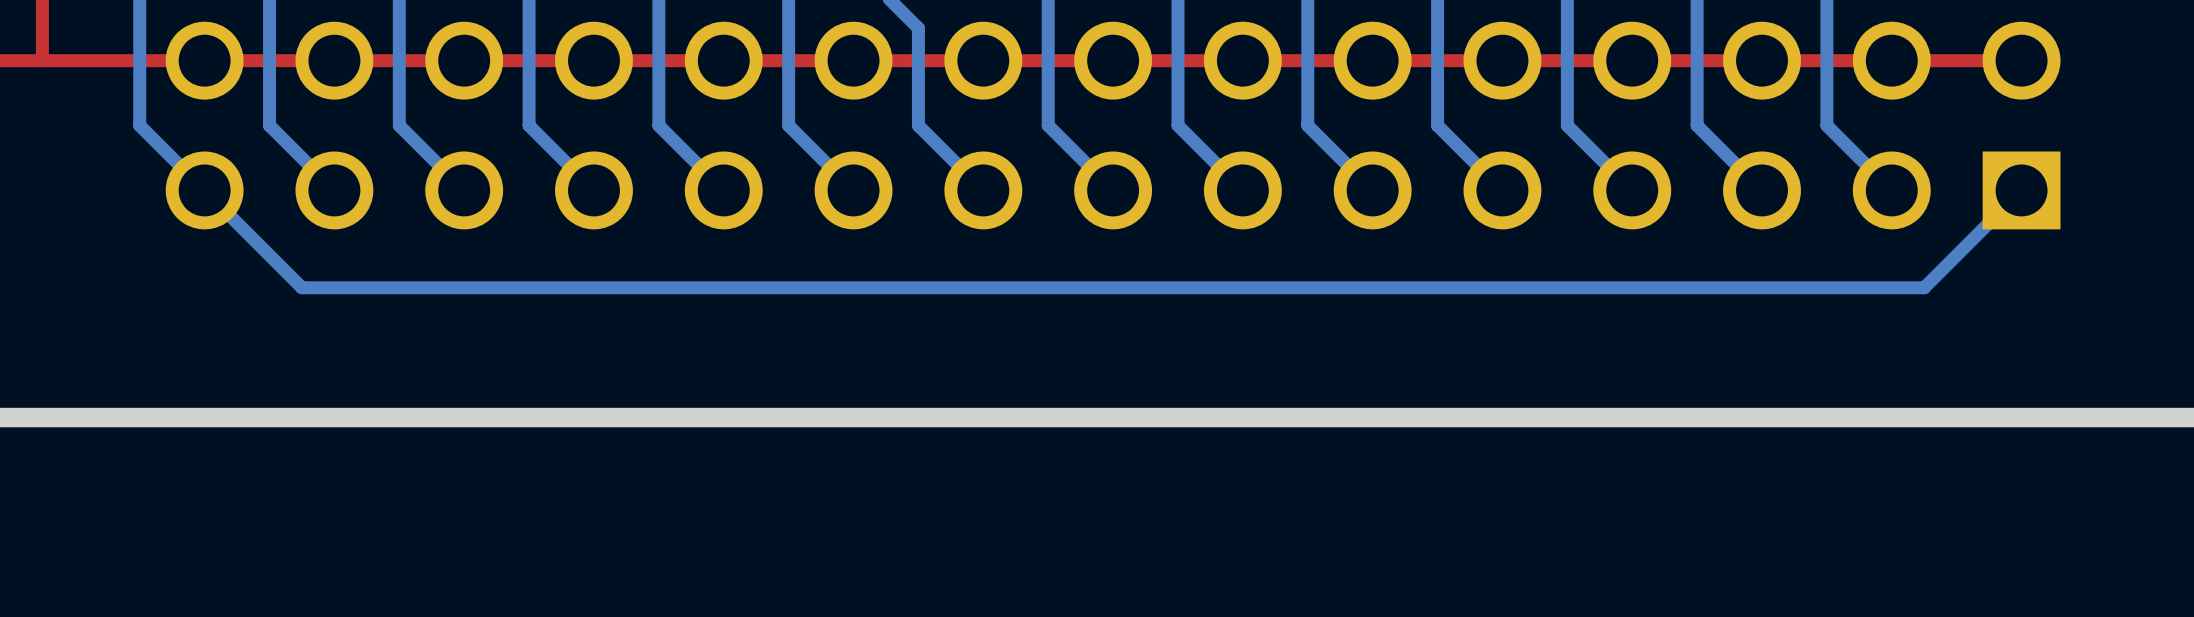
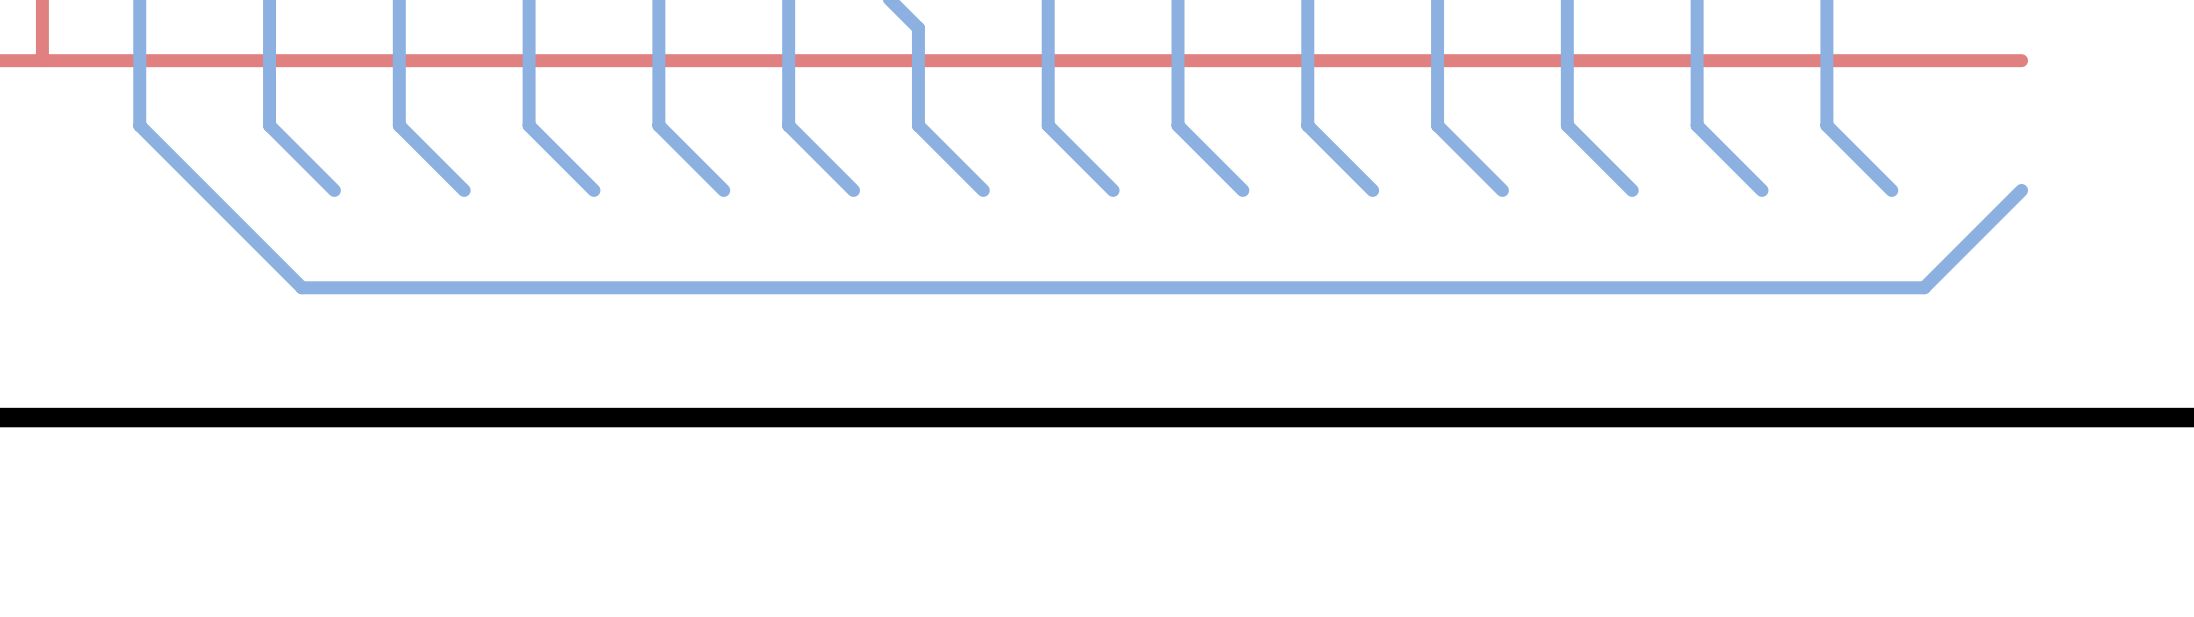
part: (1113, 125) -> none

